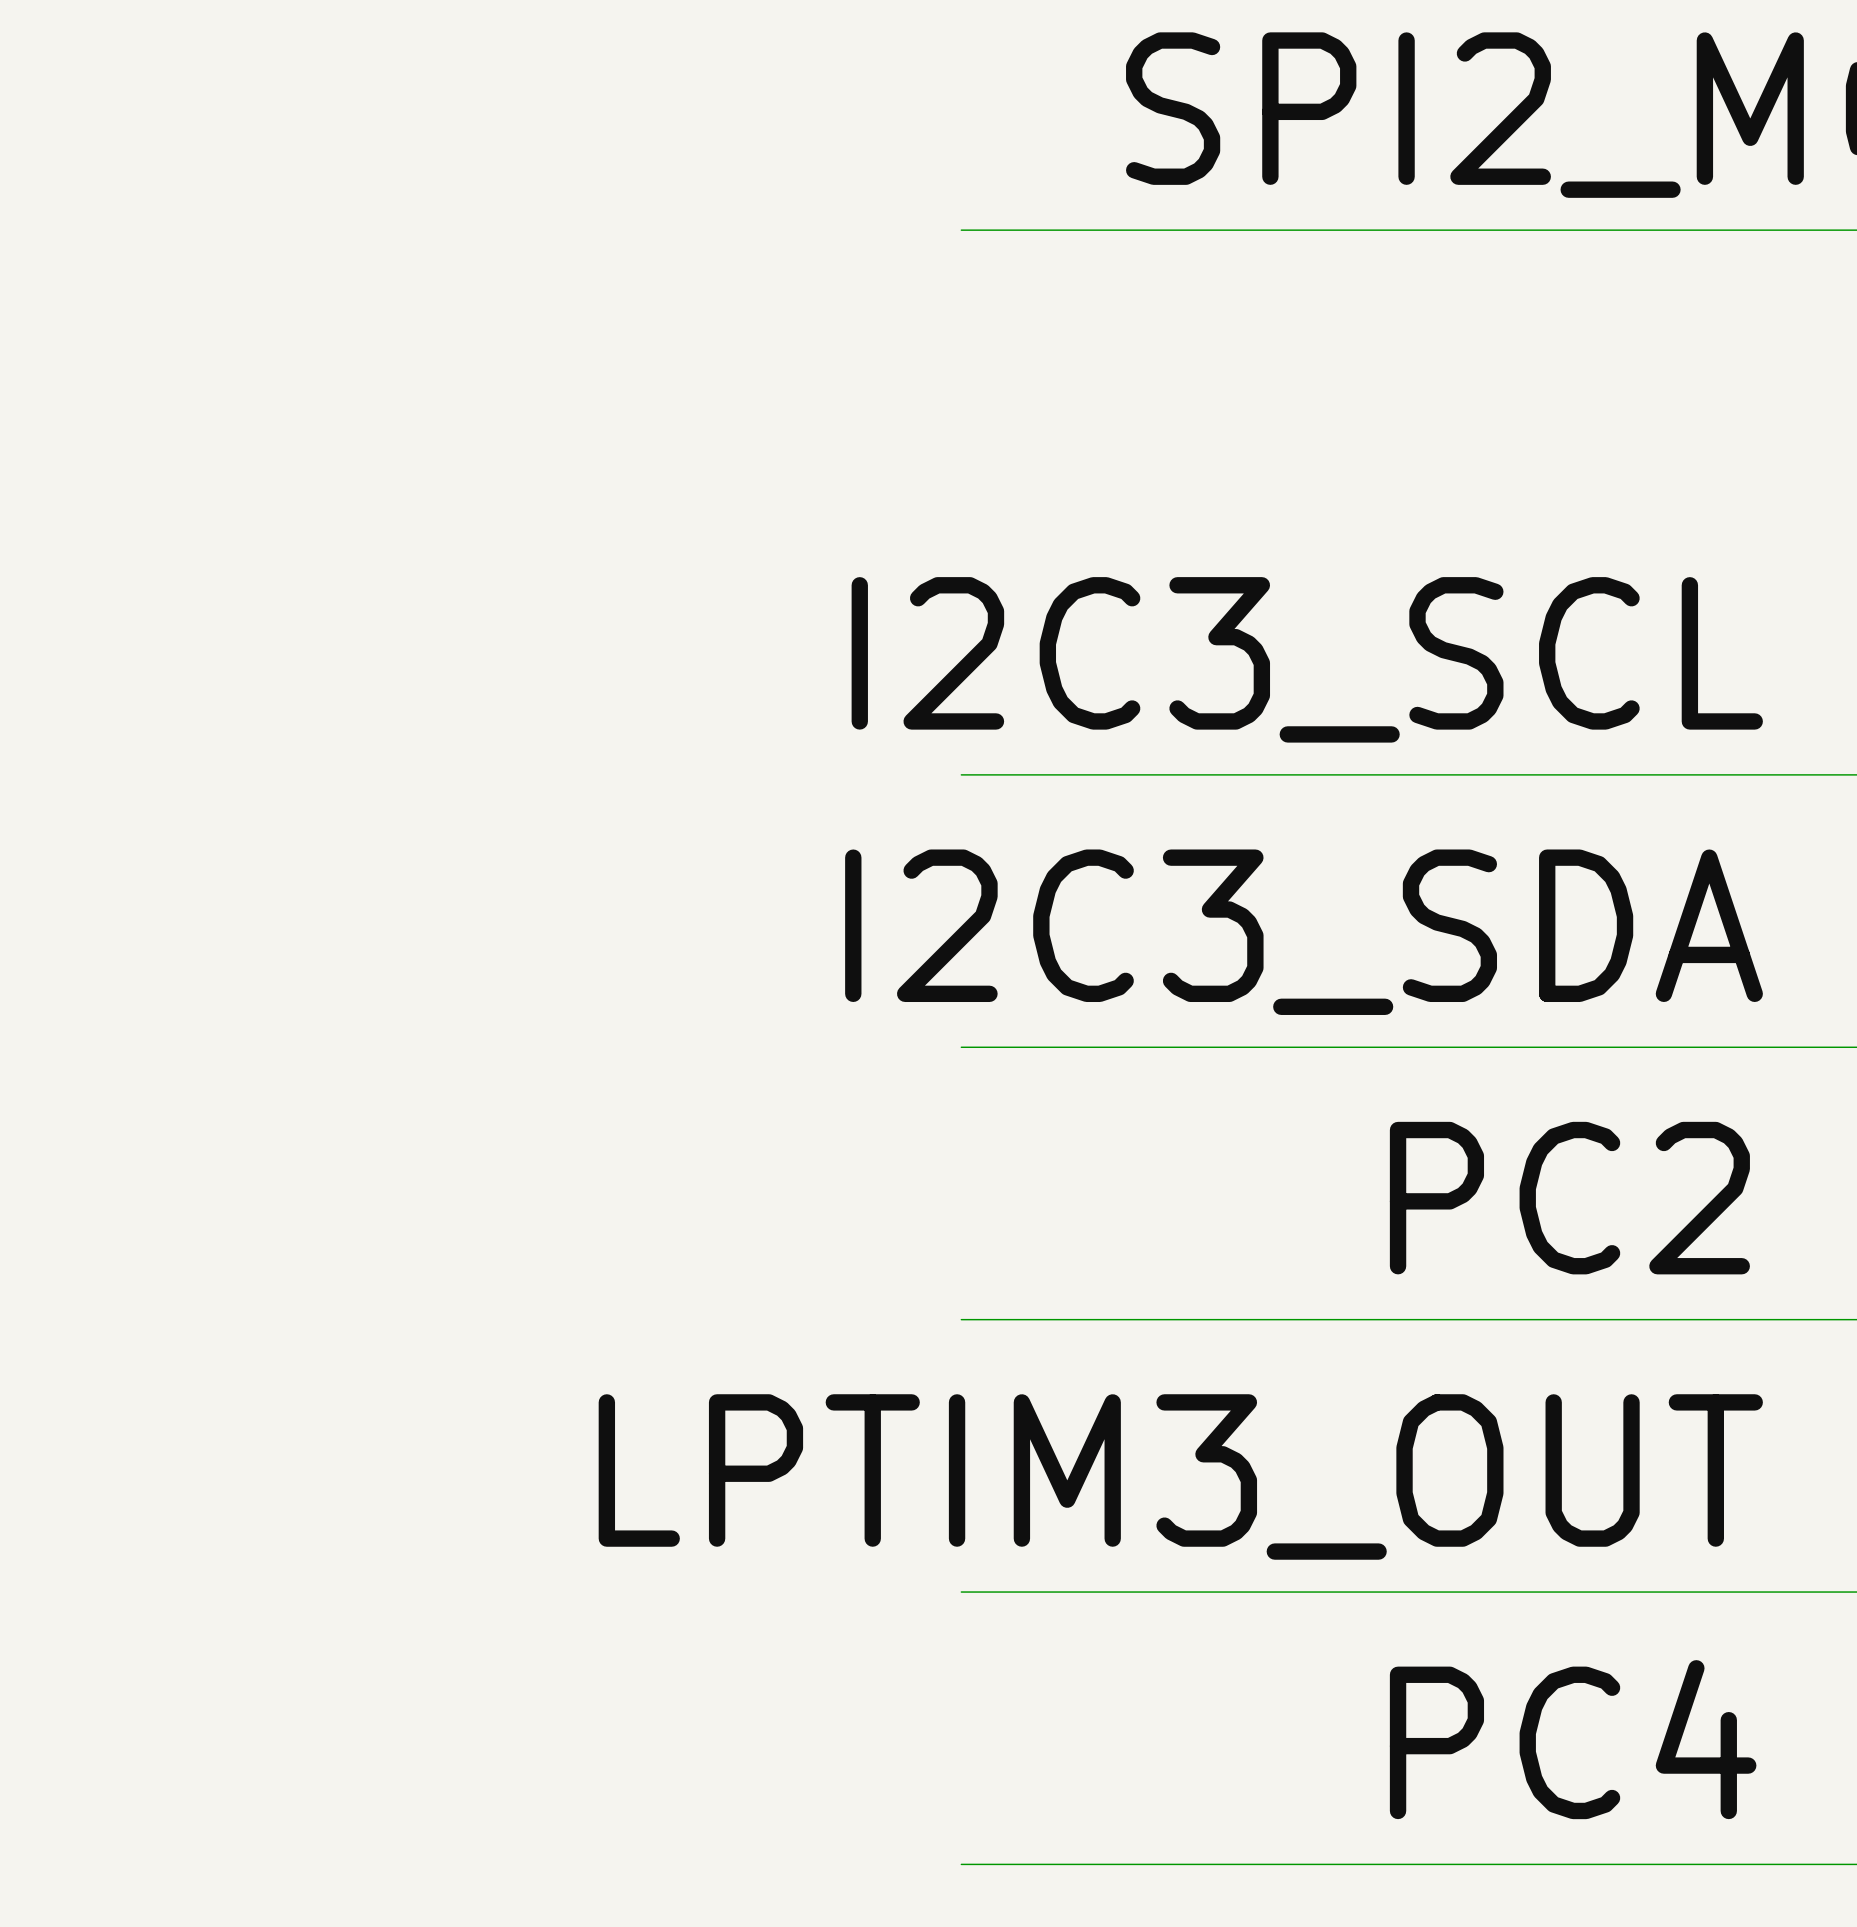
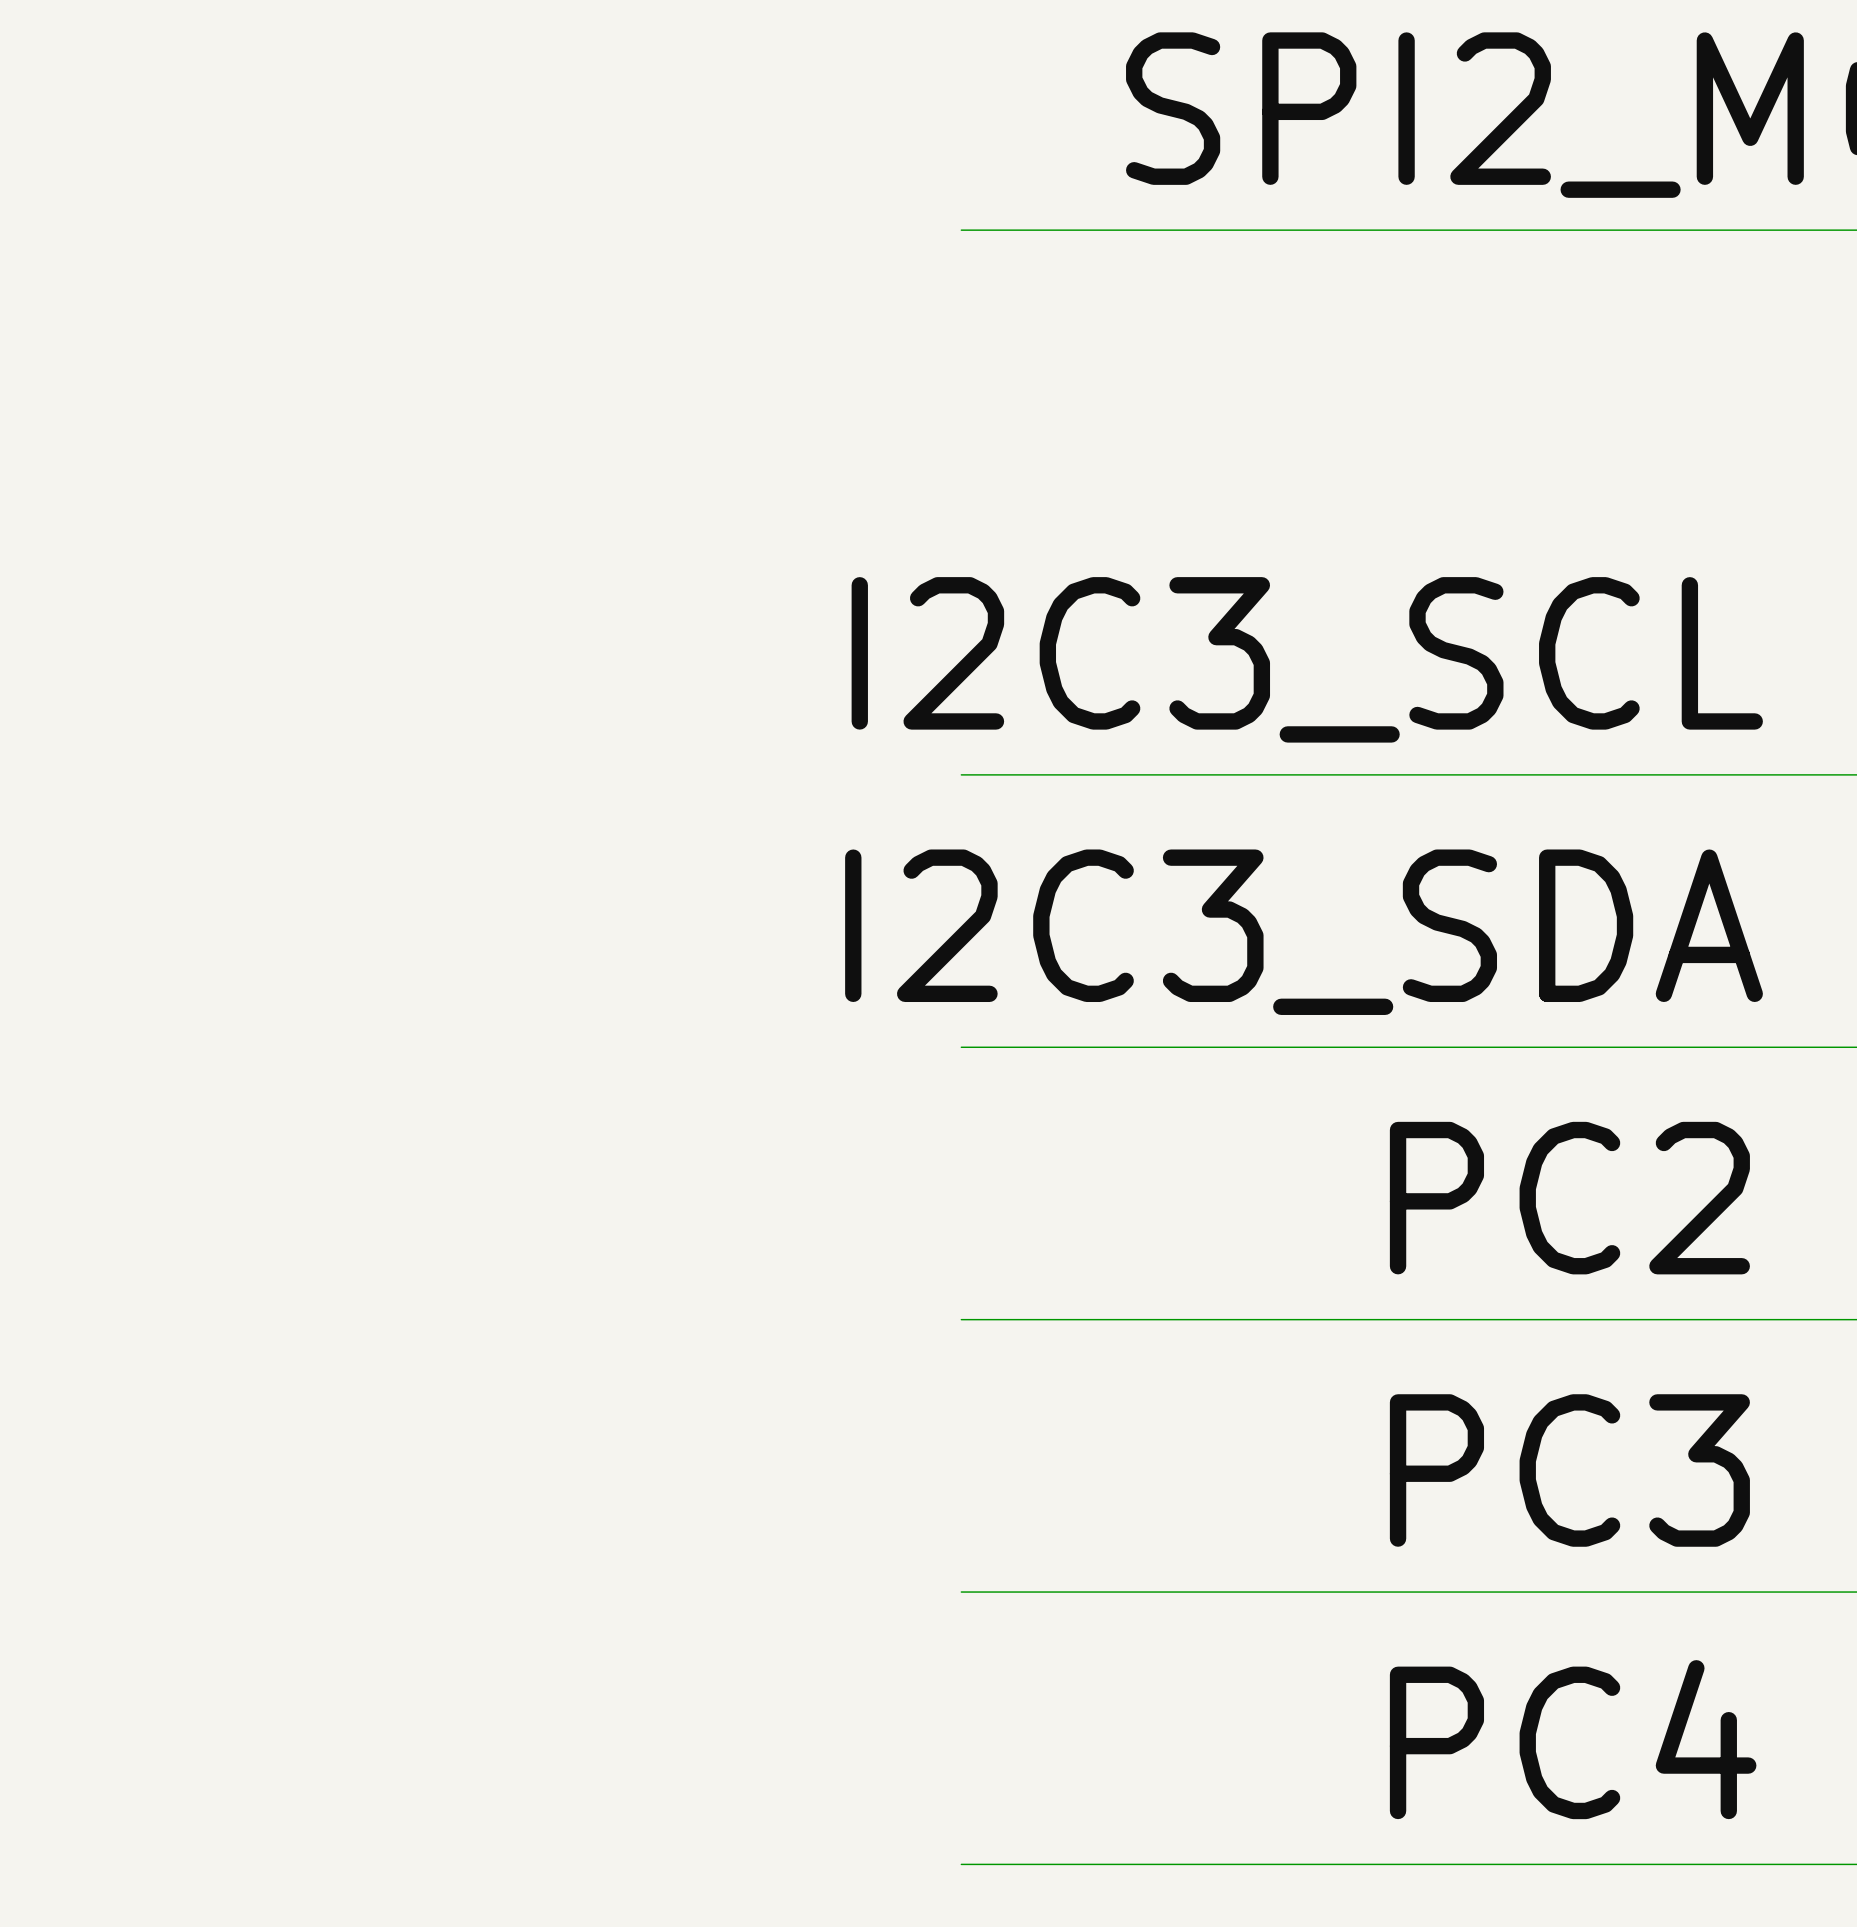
label: LPTIM3_OUT (1180, 1476) -> PC3 (1569, 1470)

